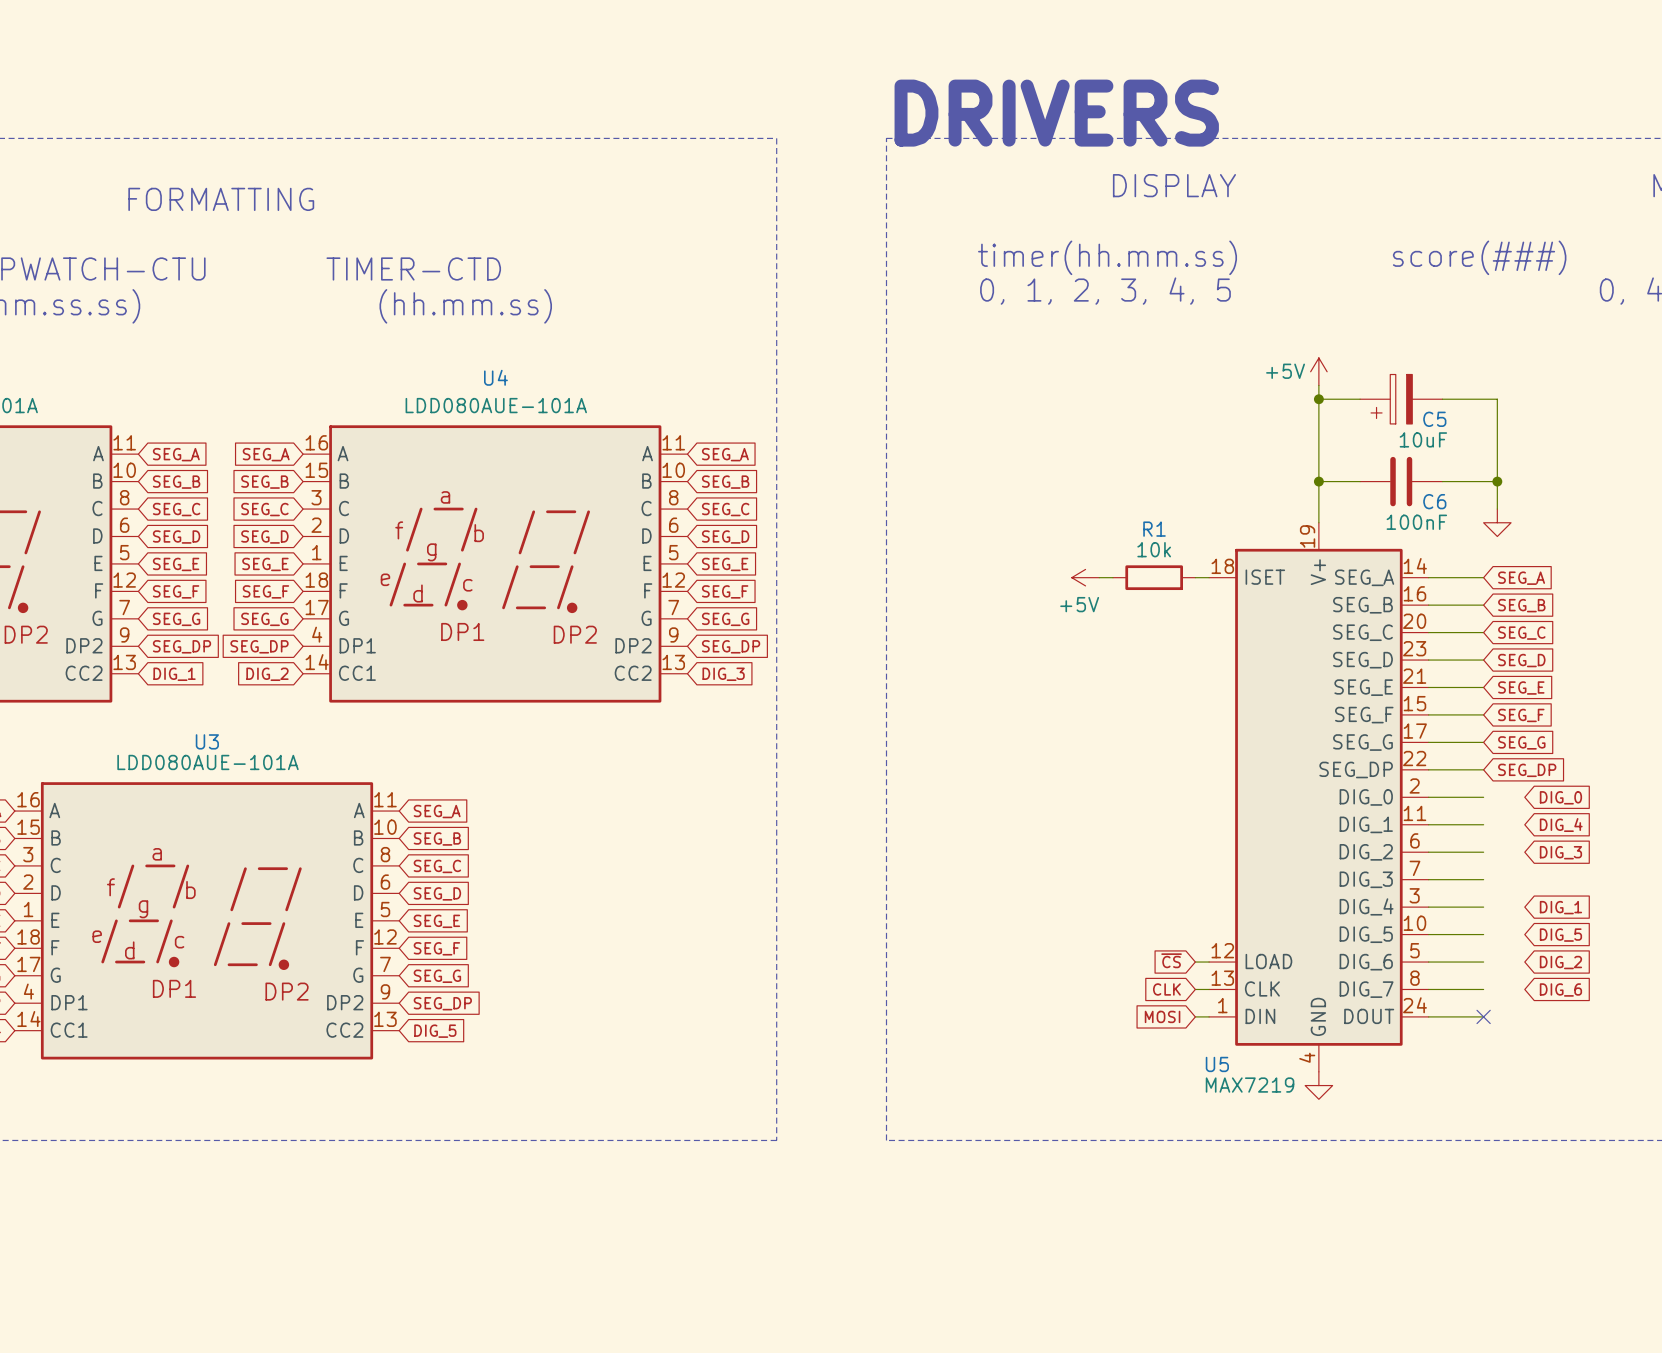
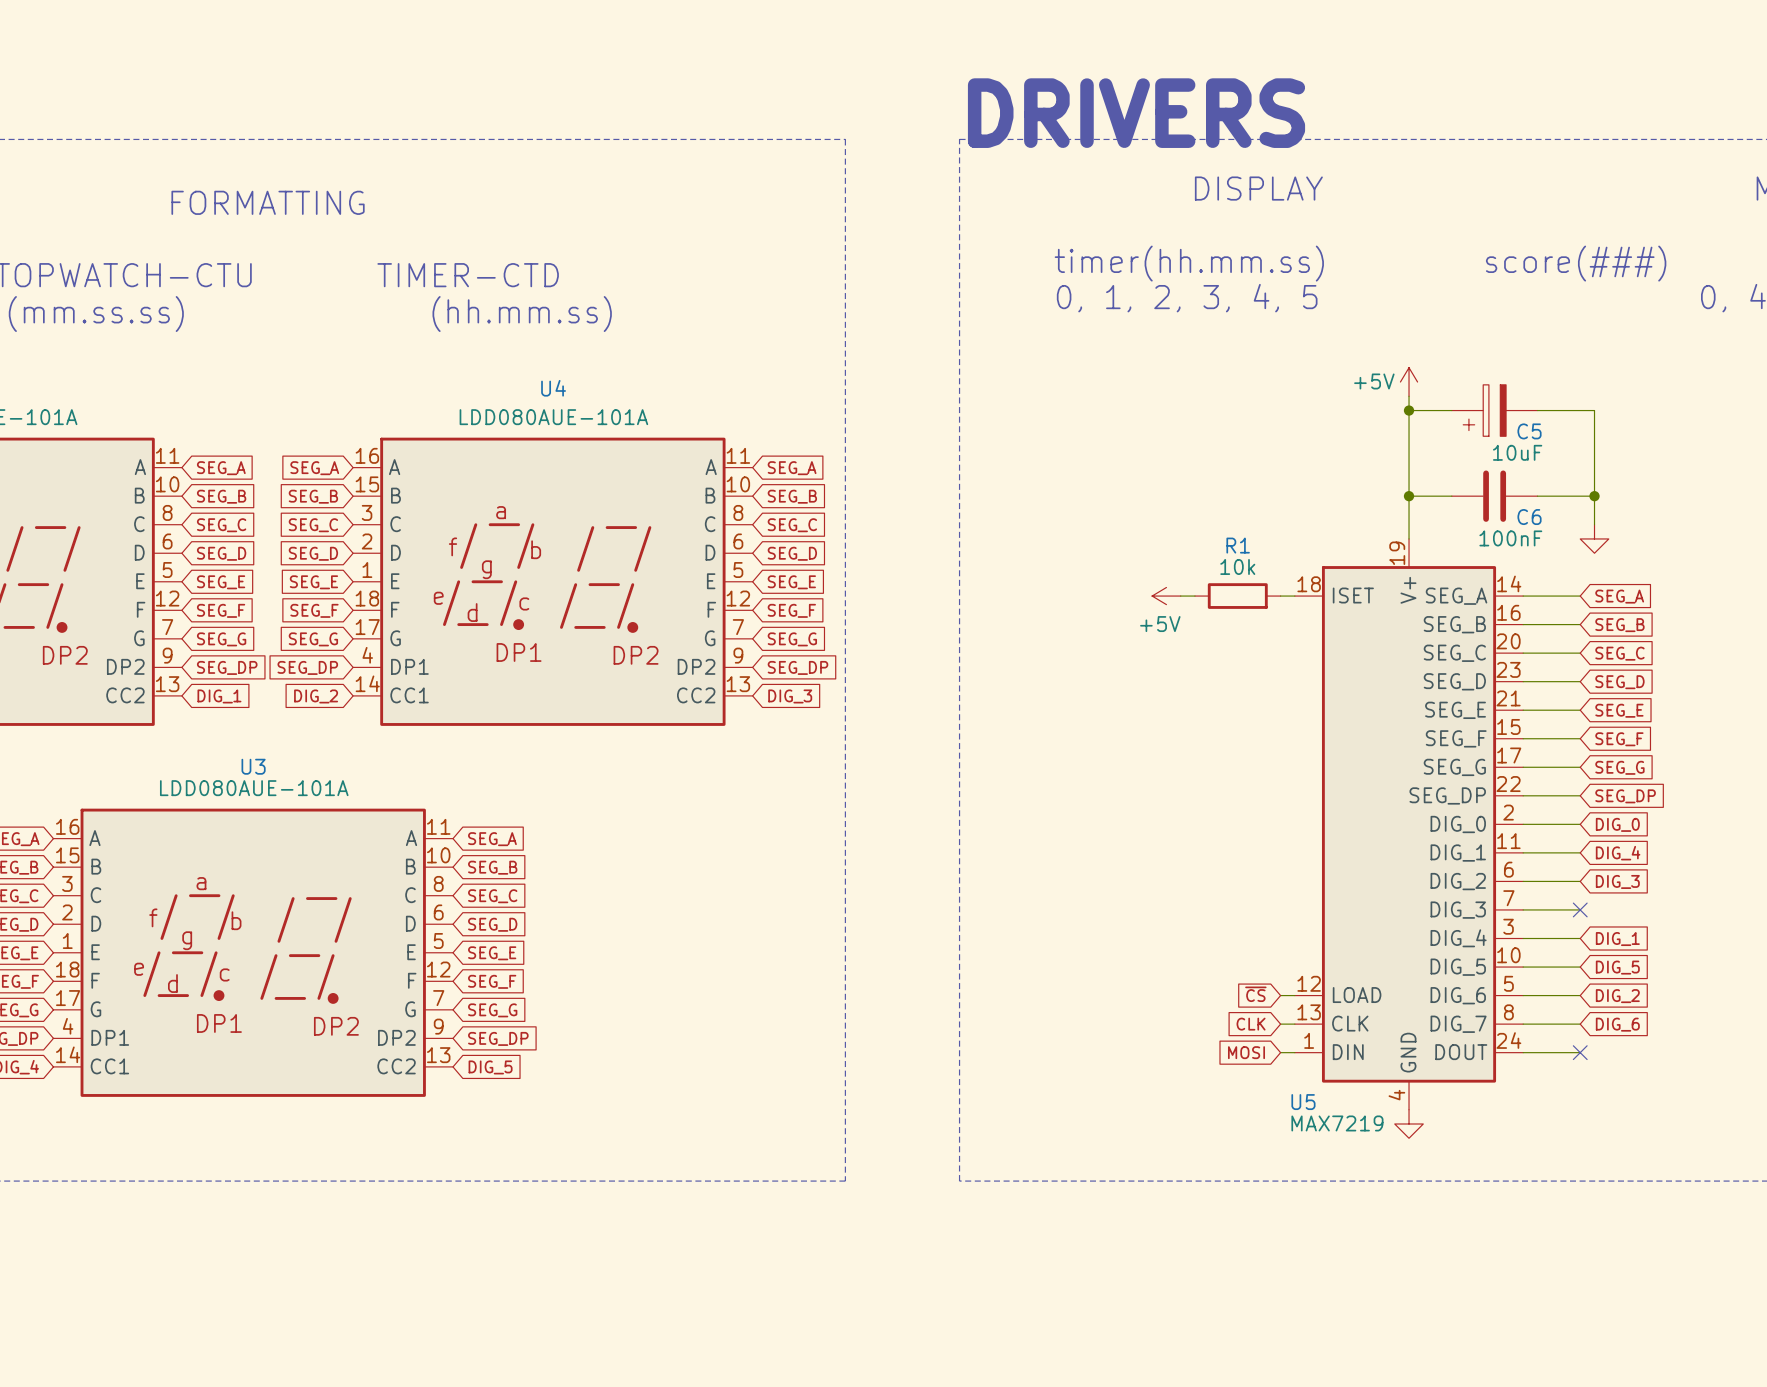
global label position: DIG_0 (1560, 797) -> DIG_0 (1617, 824)
global label position: DIG_4 (1561, 825) -> DIG_4 (1618, 853)
global label position: DIG_3 (1560, 852) -> DIG_3 (1617, 881)
no-connect mark: none -> (1580, 909)
global label position: DIG_1 (1560, 907) -> DIG_1 (1617, 939)
global label position: DIG_5 (1560, 935) -> DIG_5 (1617, 967)
global label position: DIG_2 (1560, 962) -> DIG_2 (1617, 996)
global label position: DIG_6 (1560, 989) -> DIG_6 (1617, 1024)

